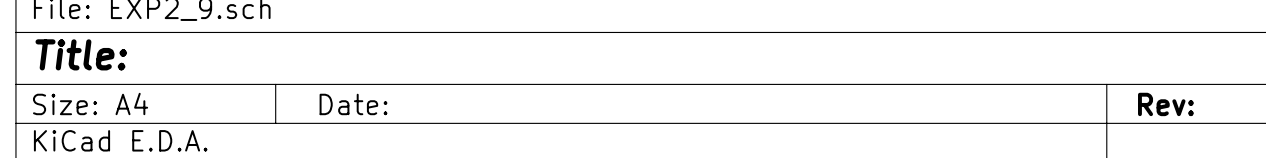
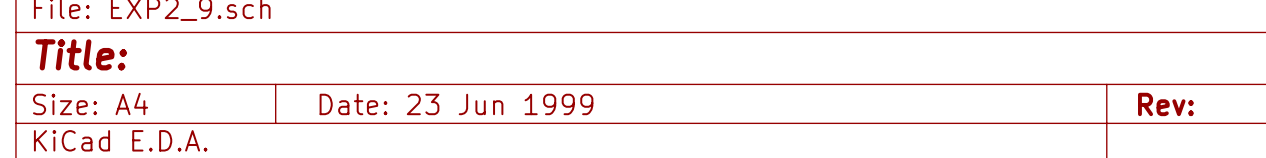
title block: Date: (353, 104) -> Date: 23 Jun 1999 (456, 104)

